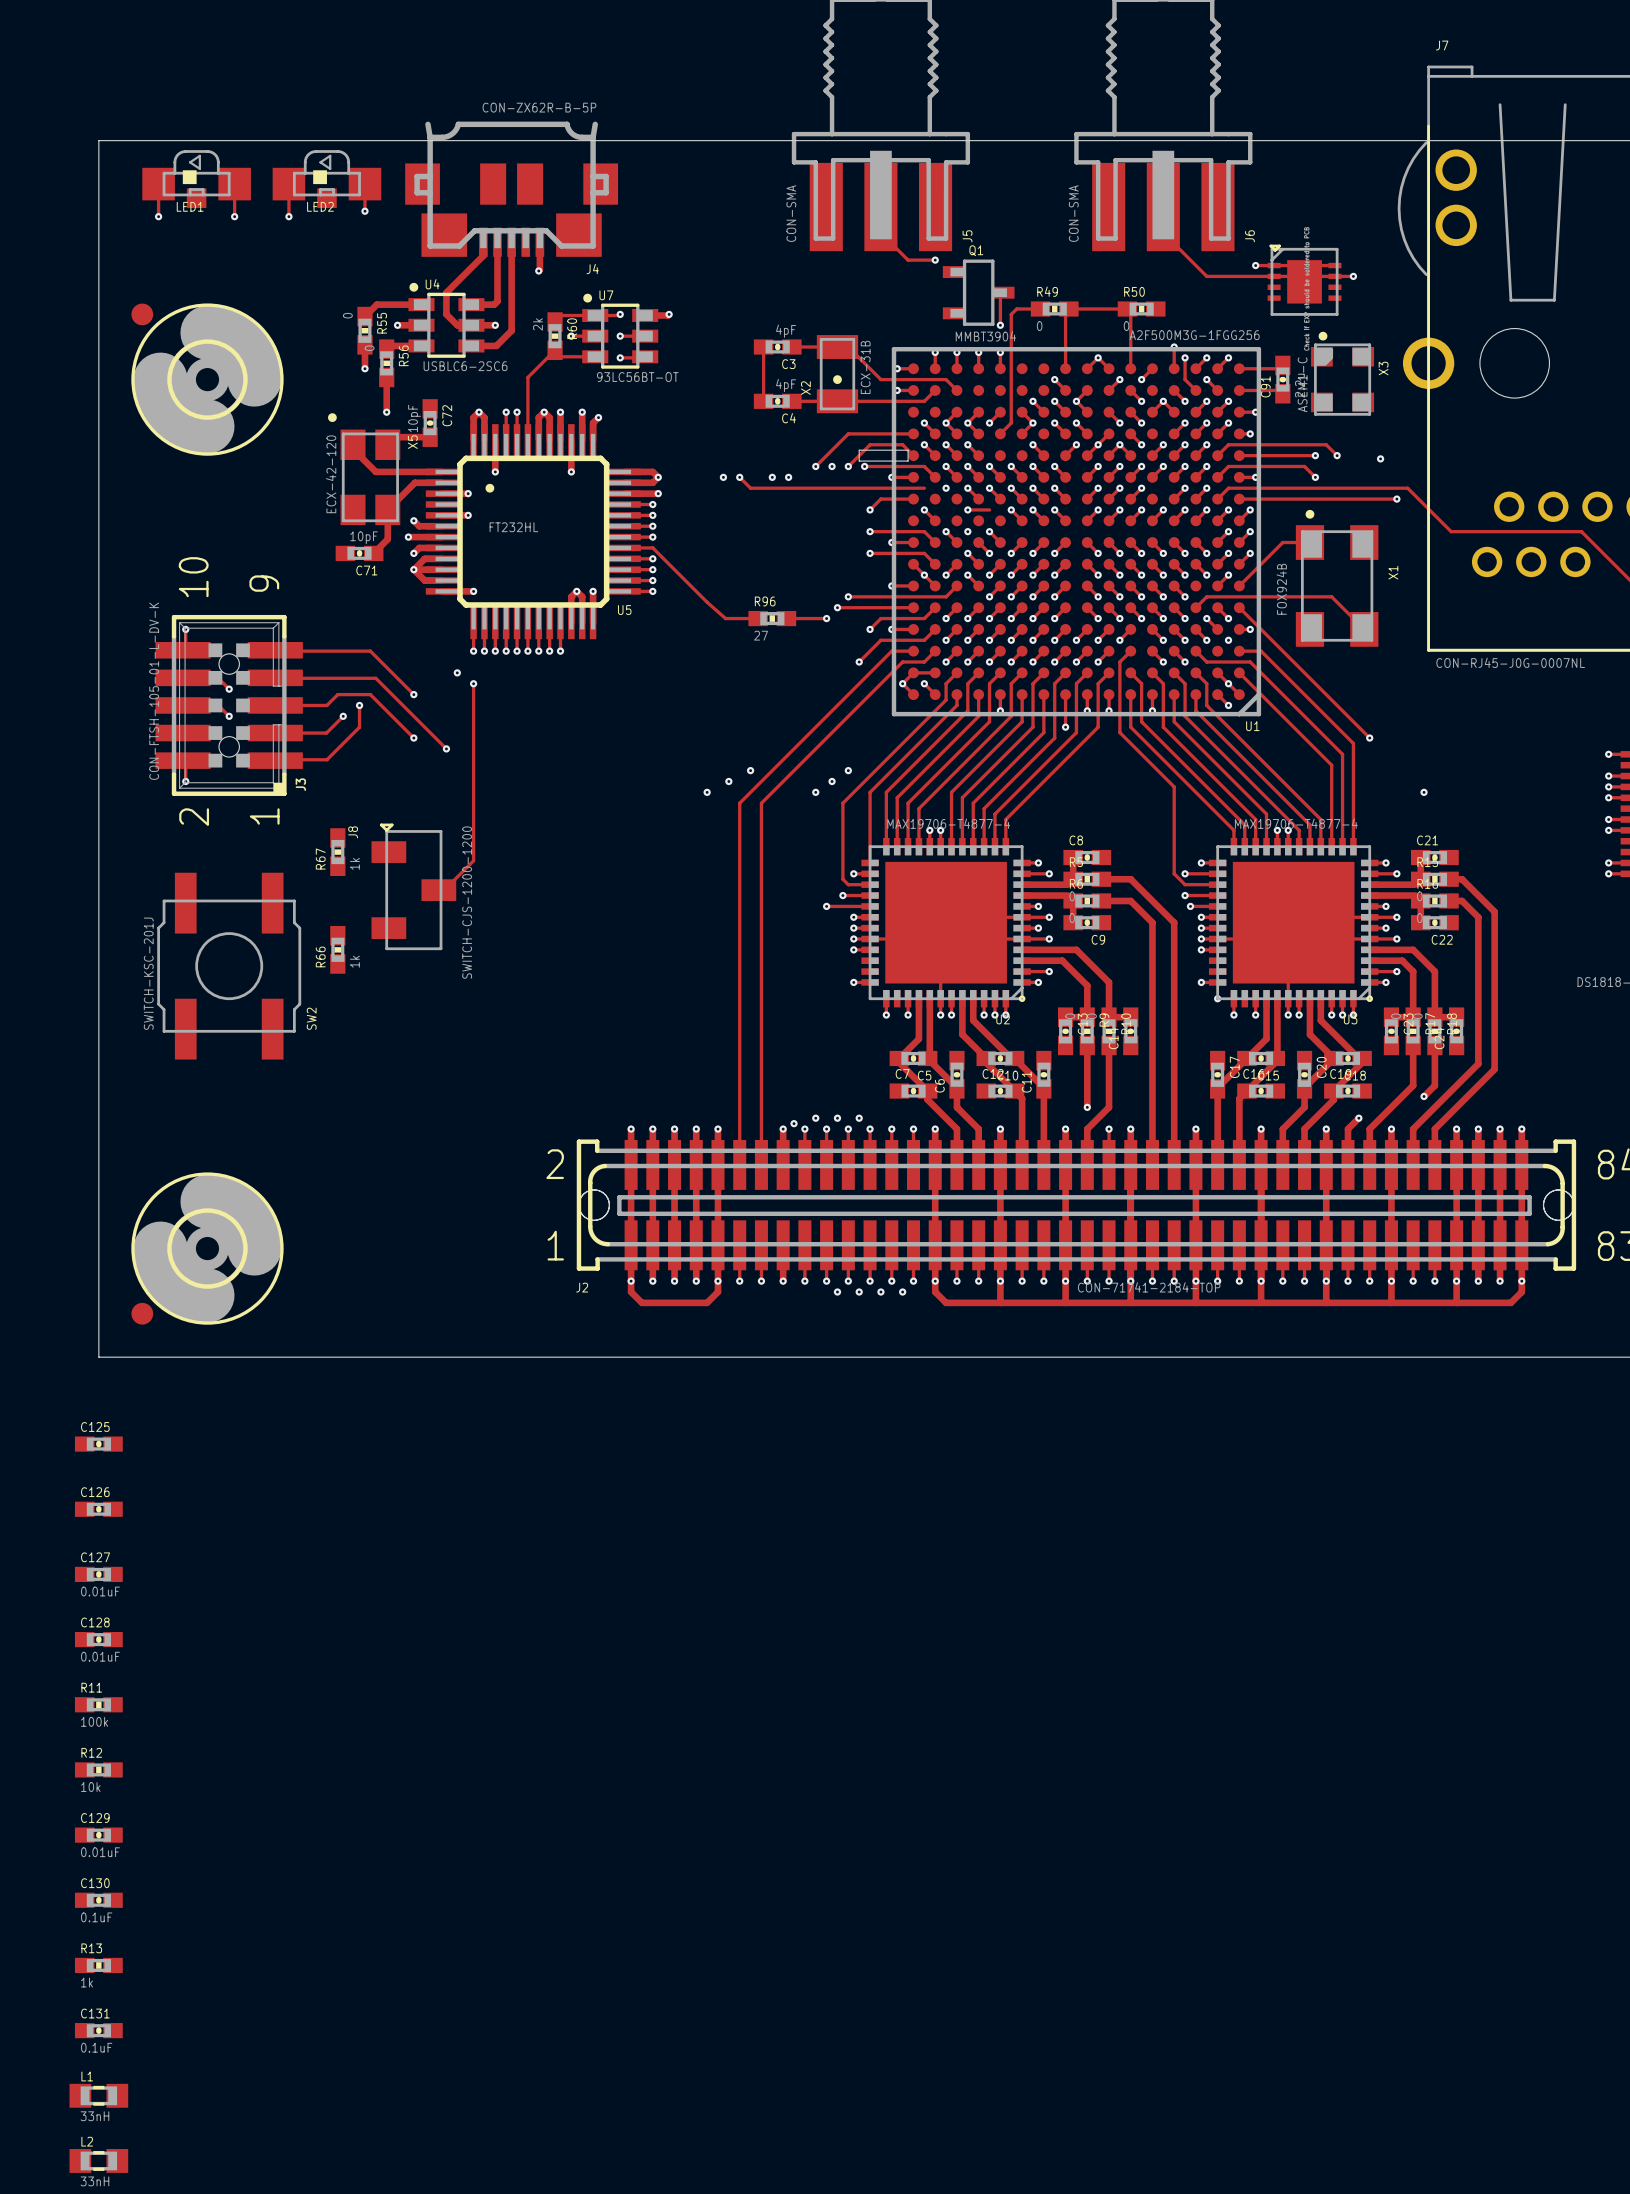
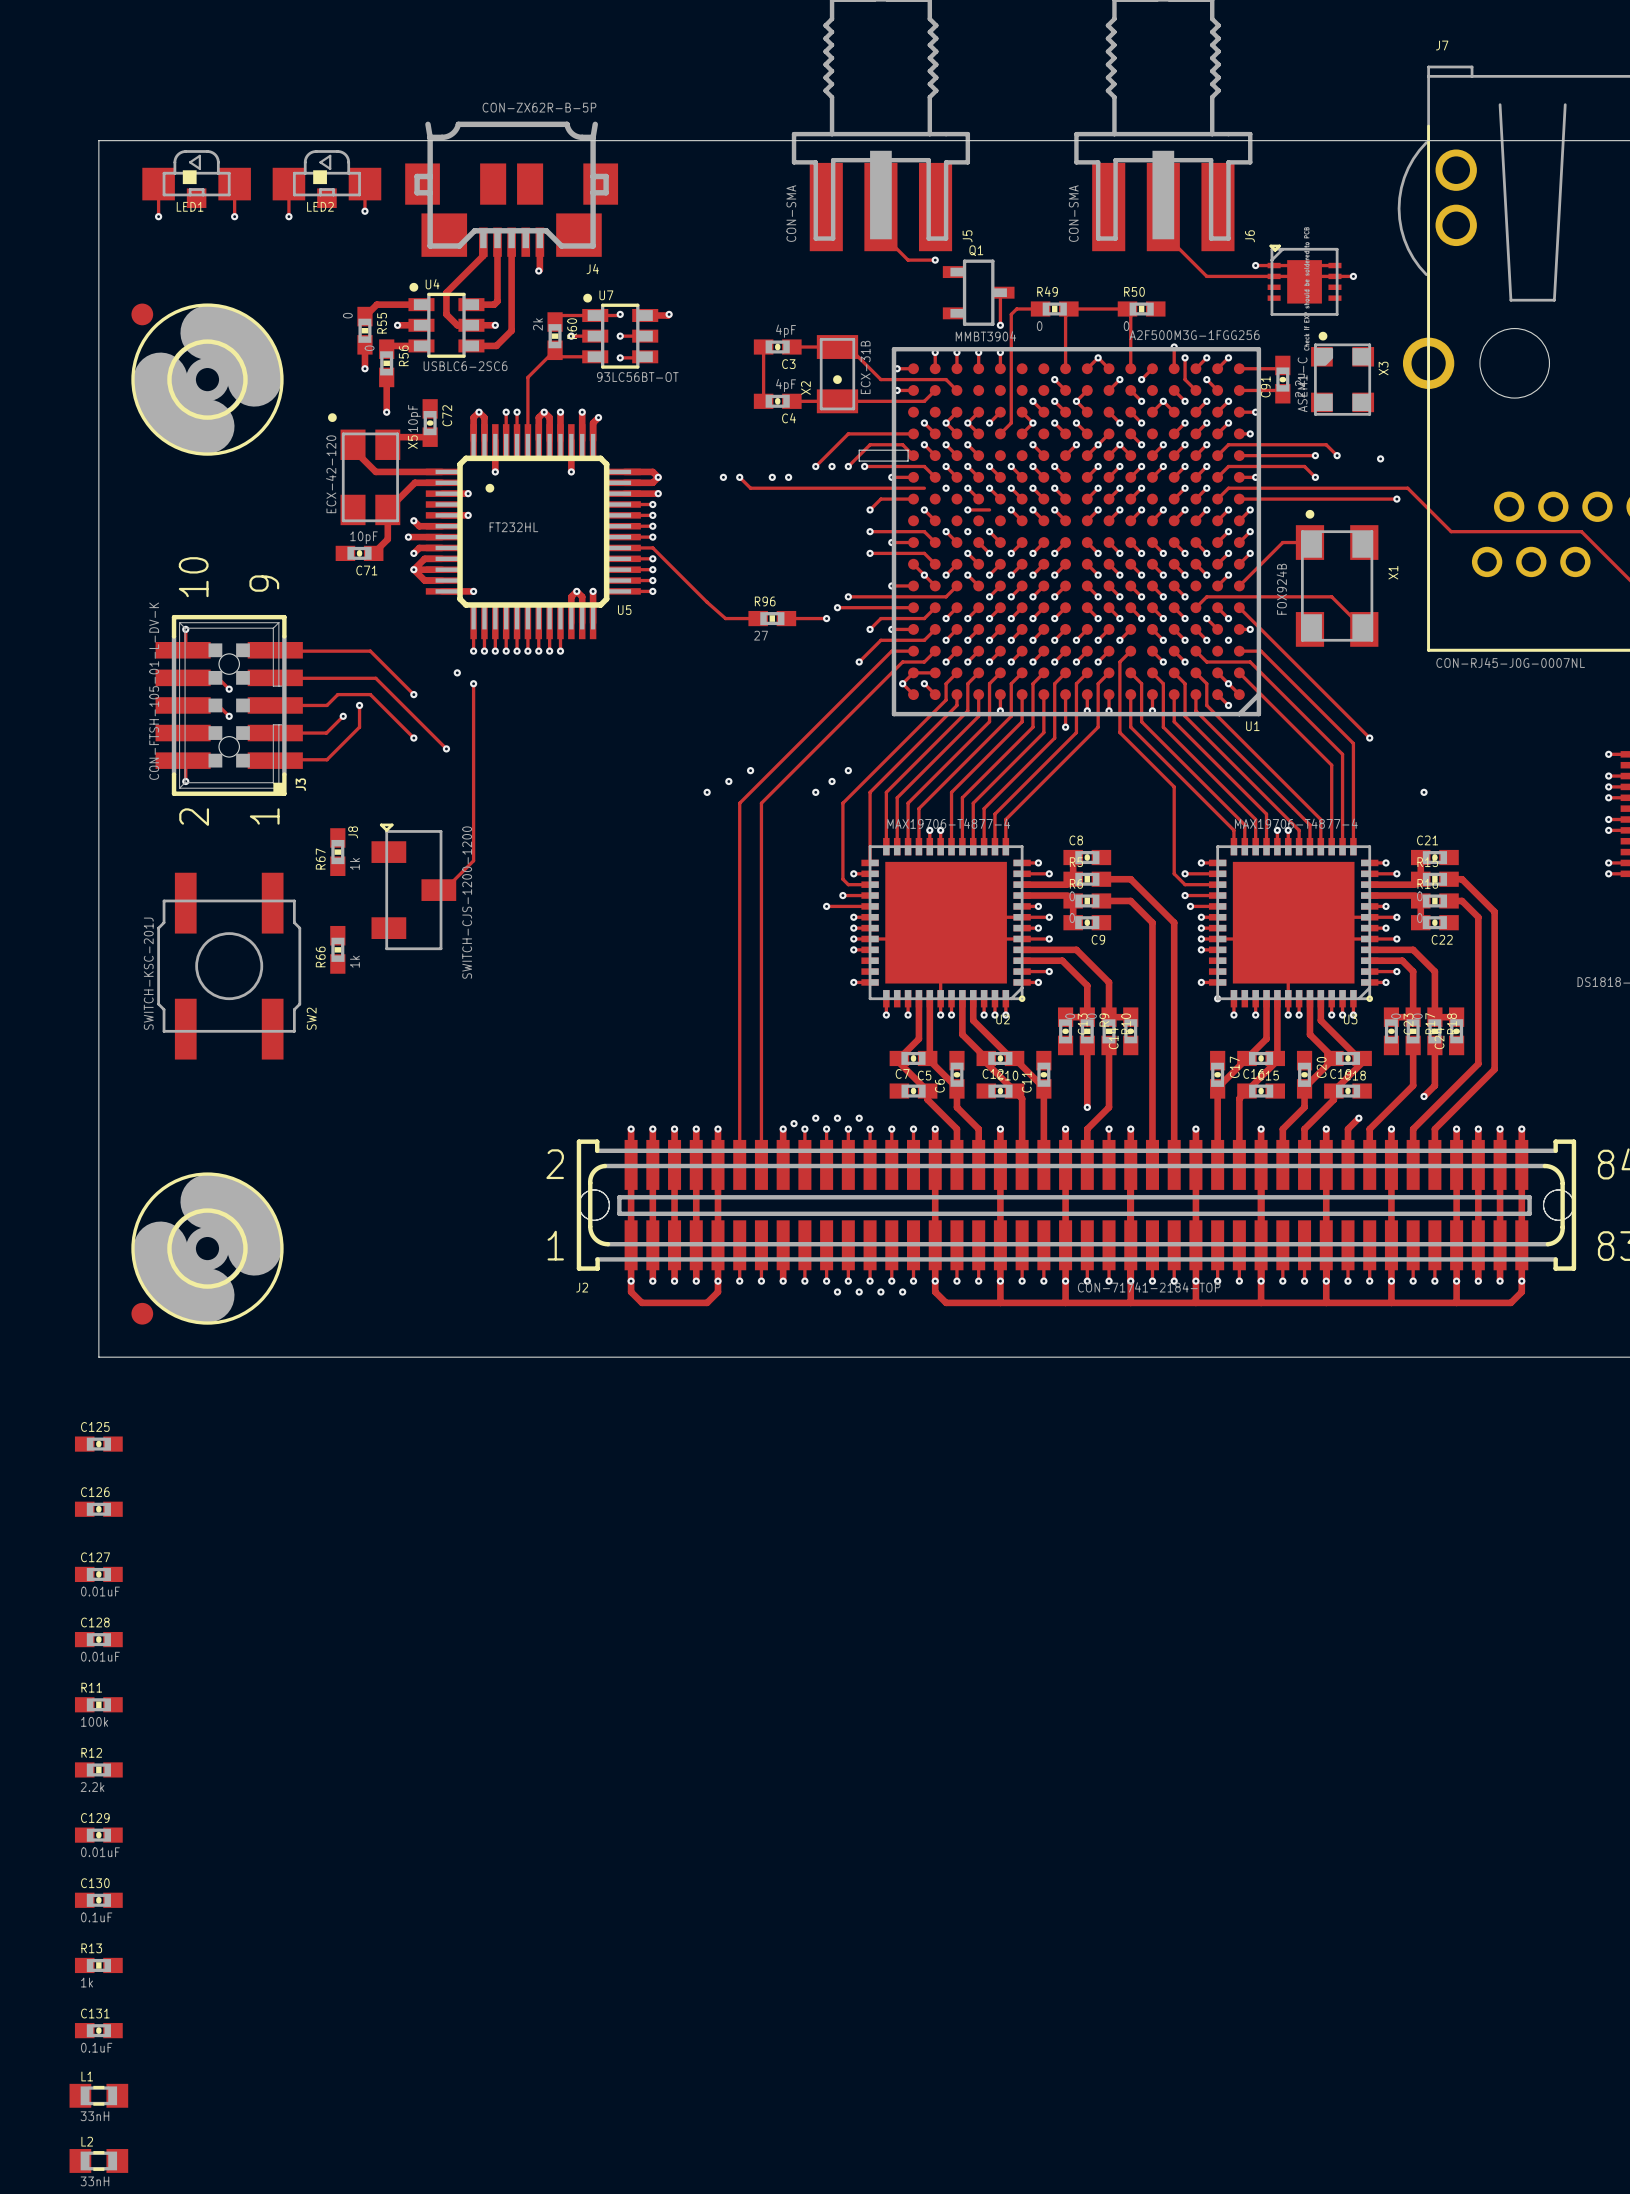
R12 value: 10k (90, 1787) -> 2.2k (92, 1787)

